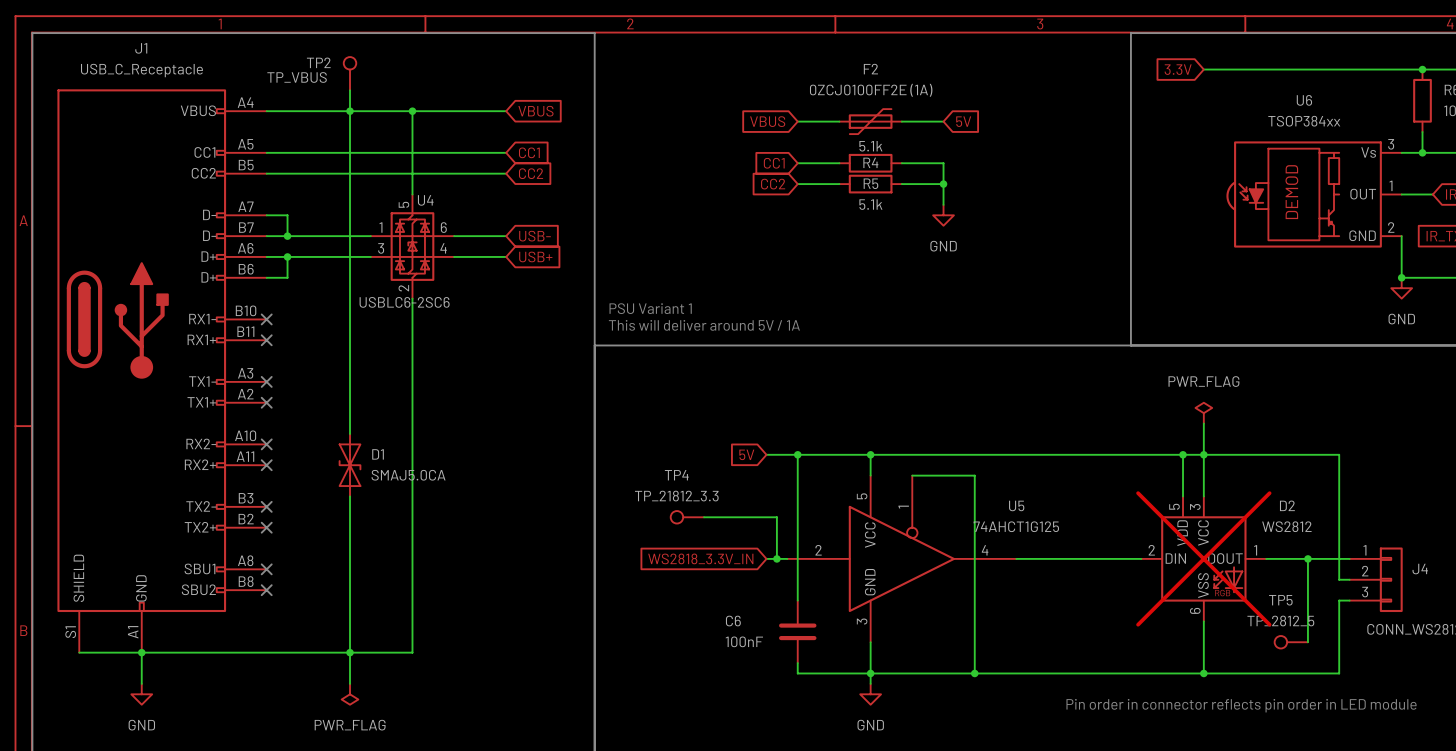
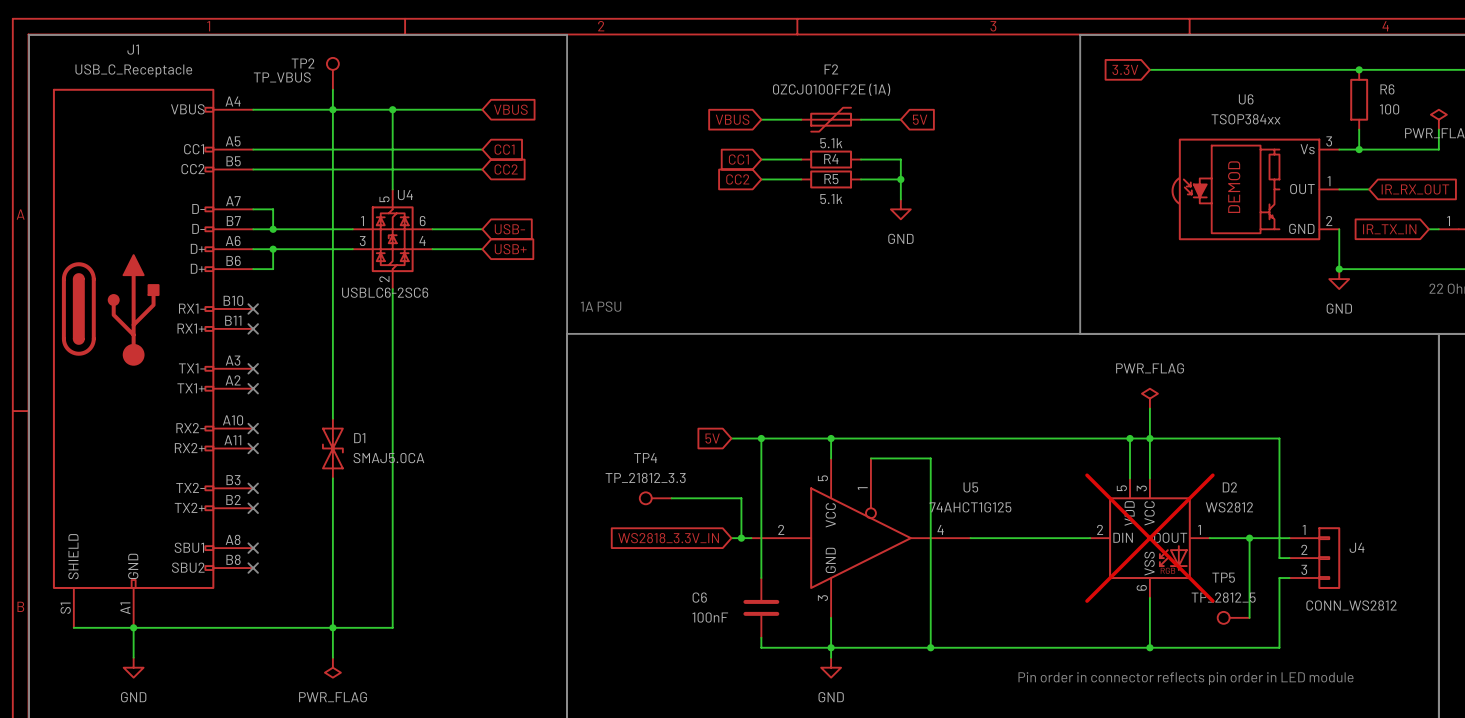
text: PSU Variant 1 (650, 308) -> none
text: none -> 1A PSU (601, 306)
text: This will deliver around 5V / 1A (704, 325) -> none

